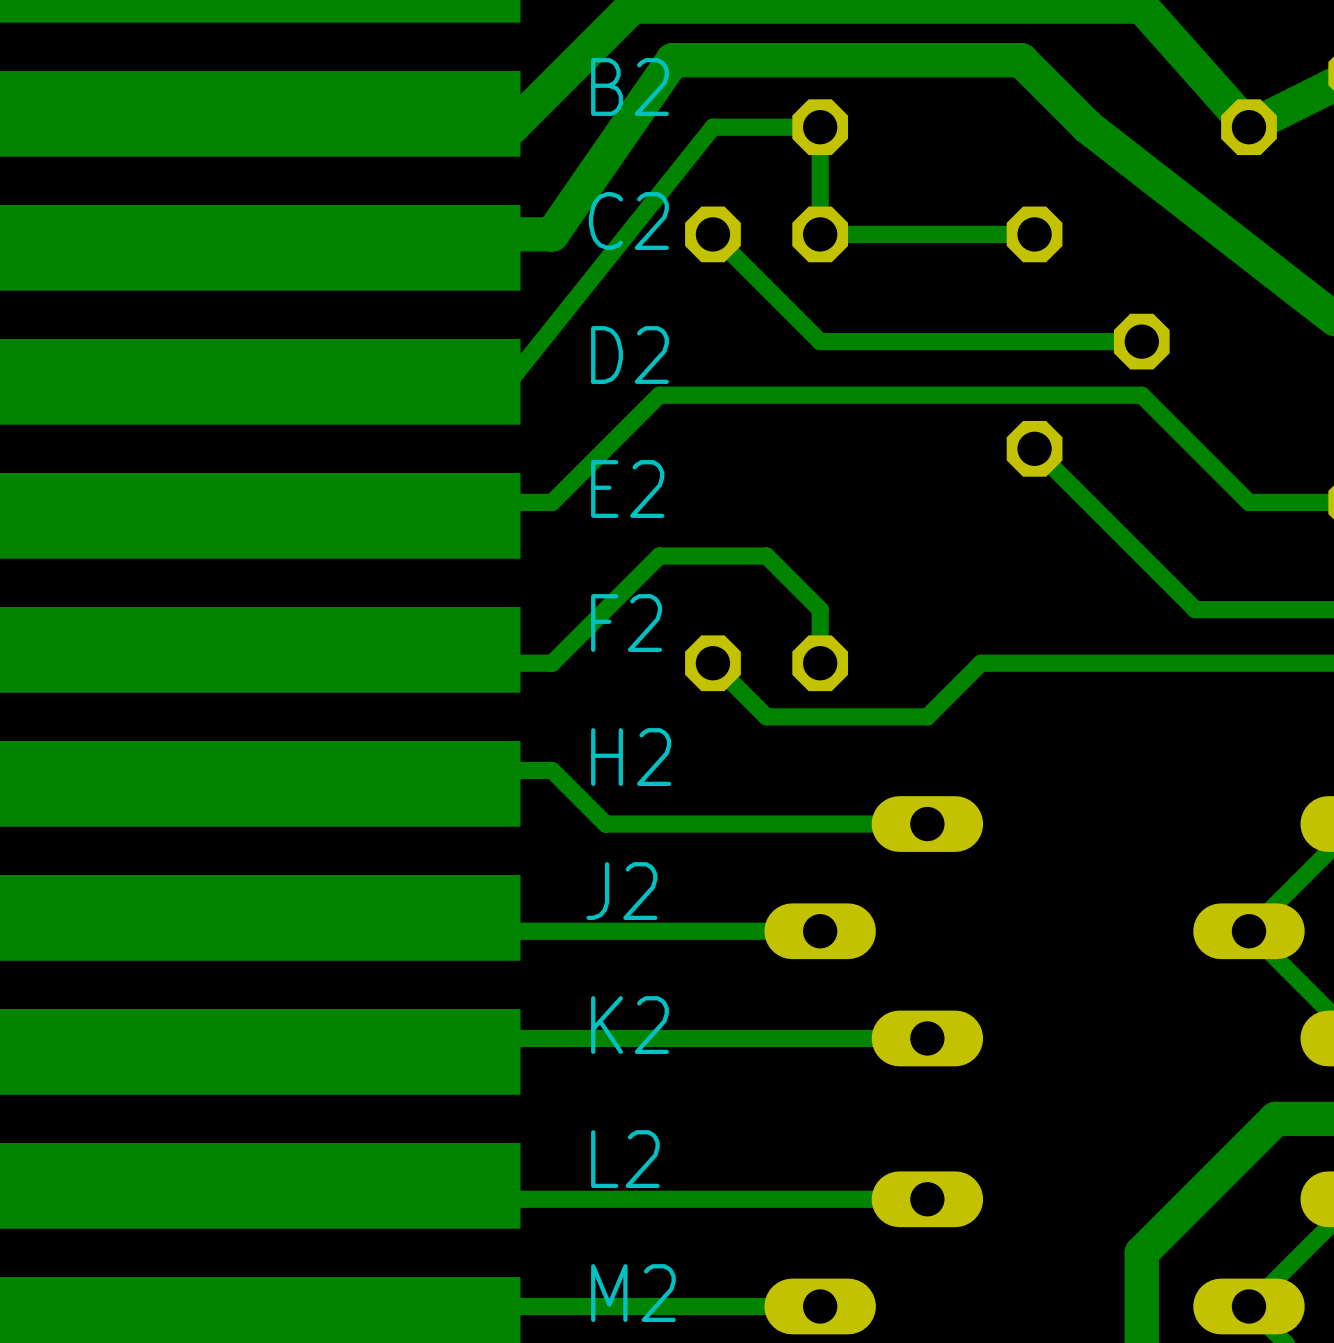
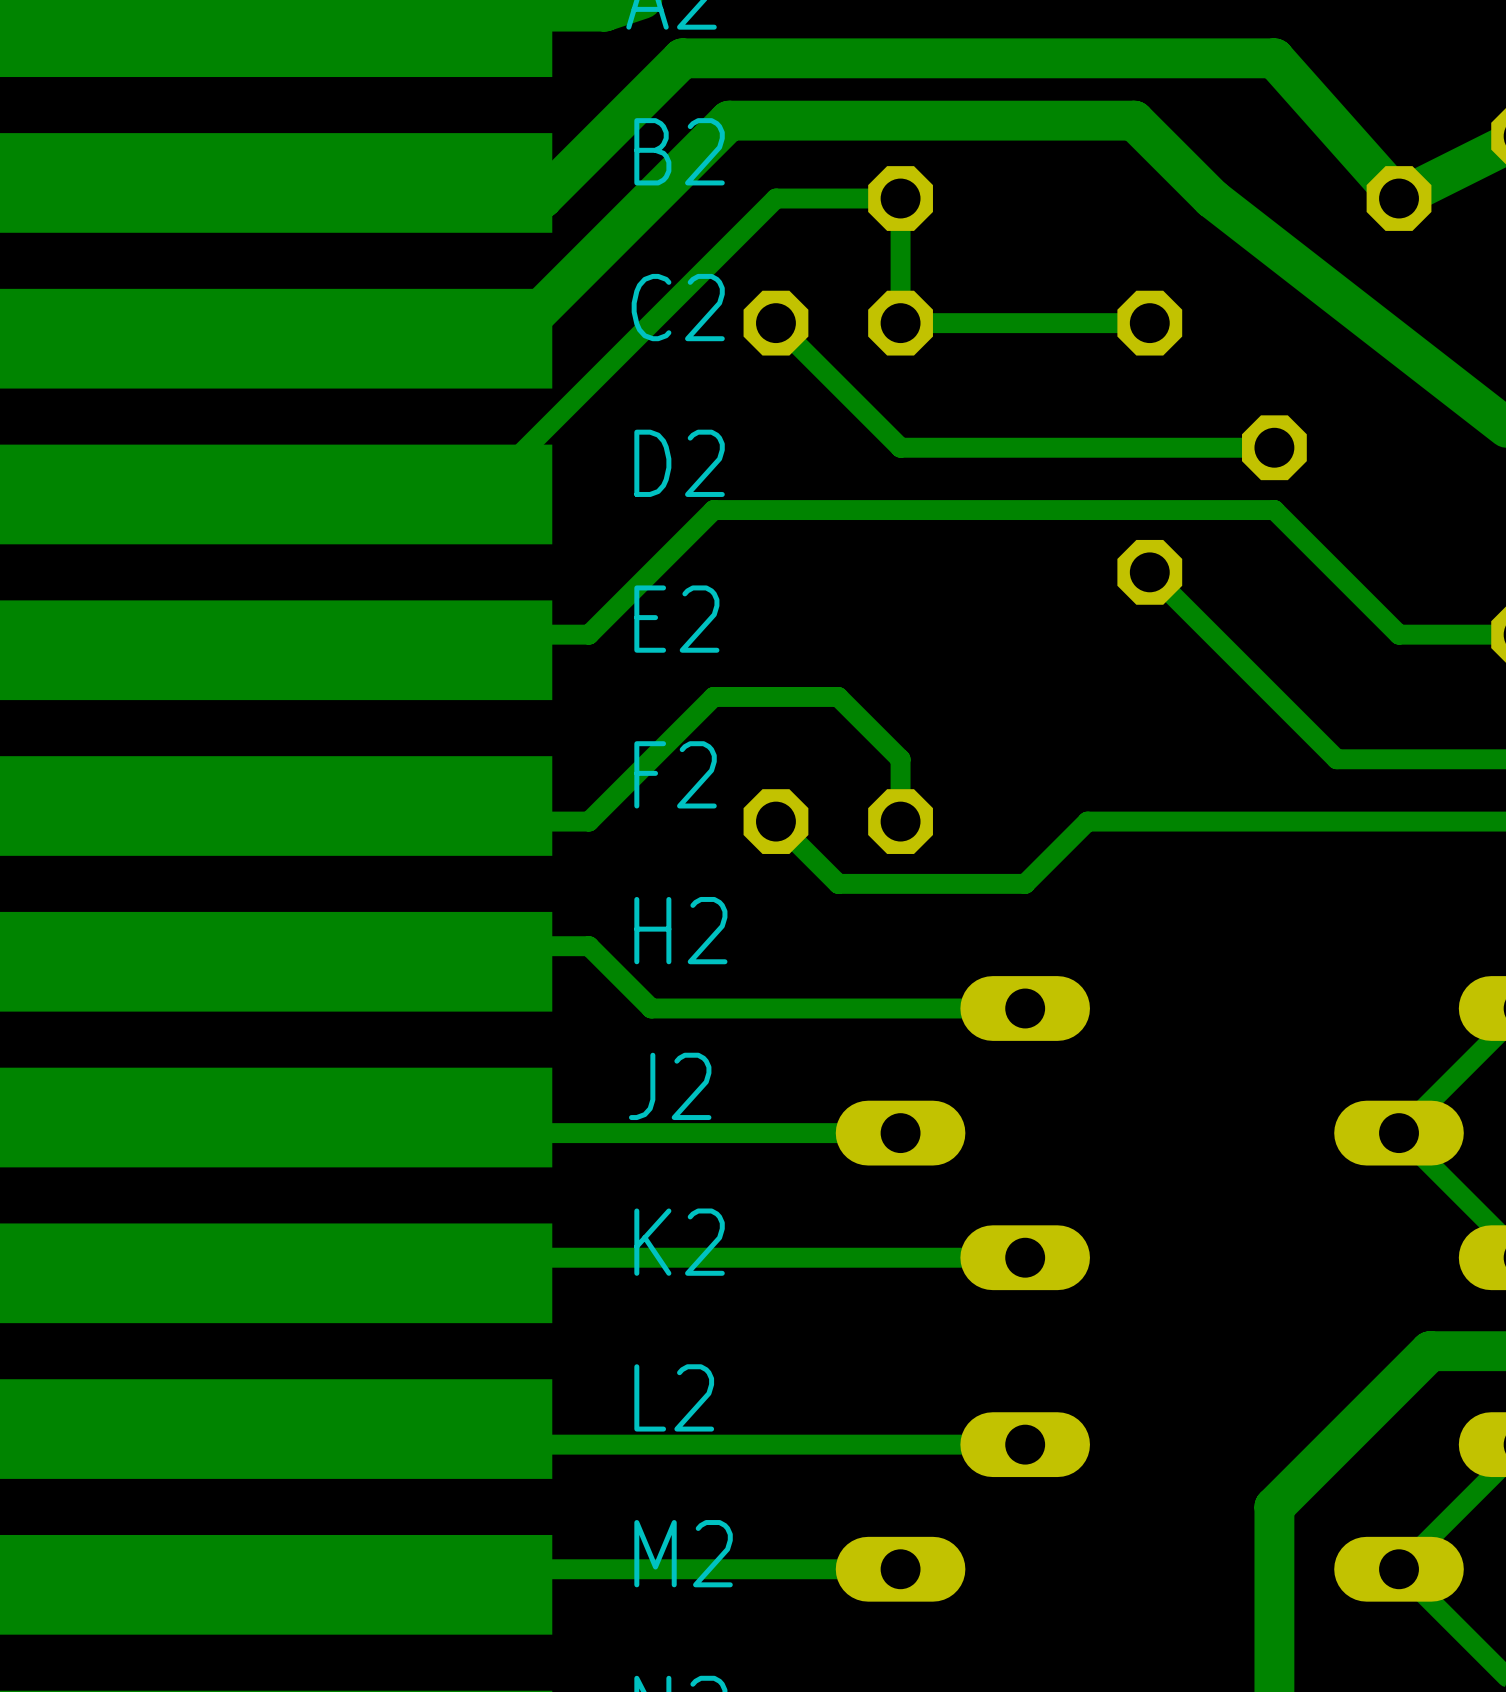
bottom track: (672, 60) (552, 234) (498, 234) -> (729, 120) (526, 323)
bottom track: (712, 127) (498, 395) (444, 395) -> (775, 198) (464, 510)

